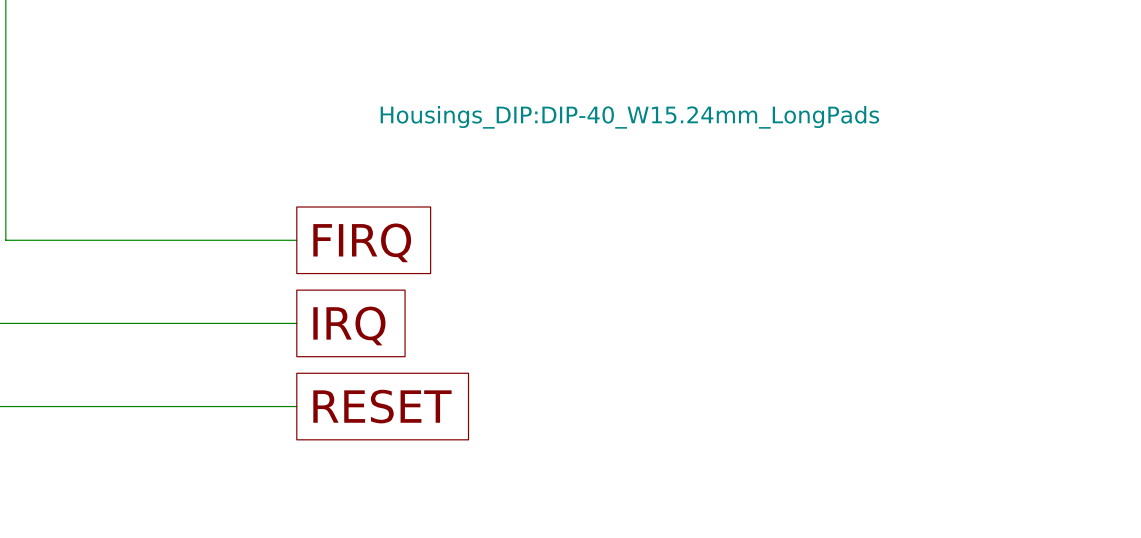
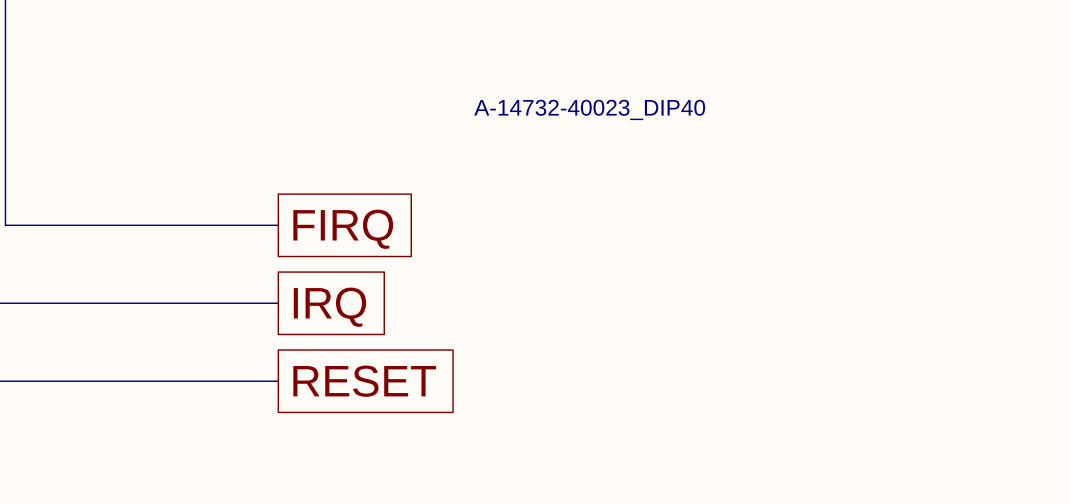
part text: Housings_DIP:DIP-40_W15.24mm_LongPads (629, 117) -> A-14732-40023_DIP40 (589, 109)

